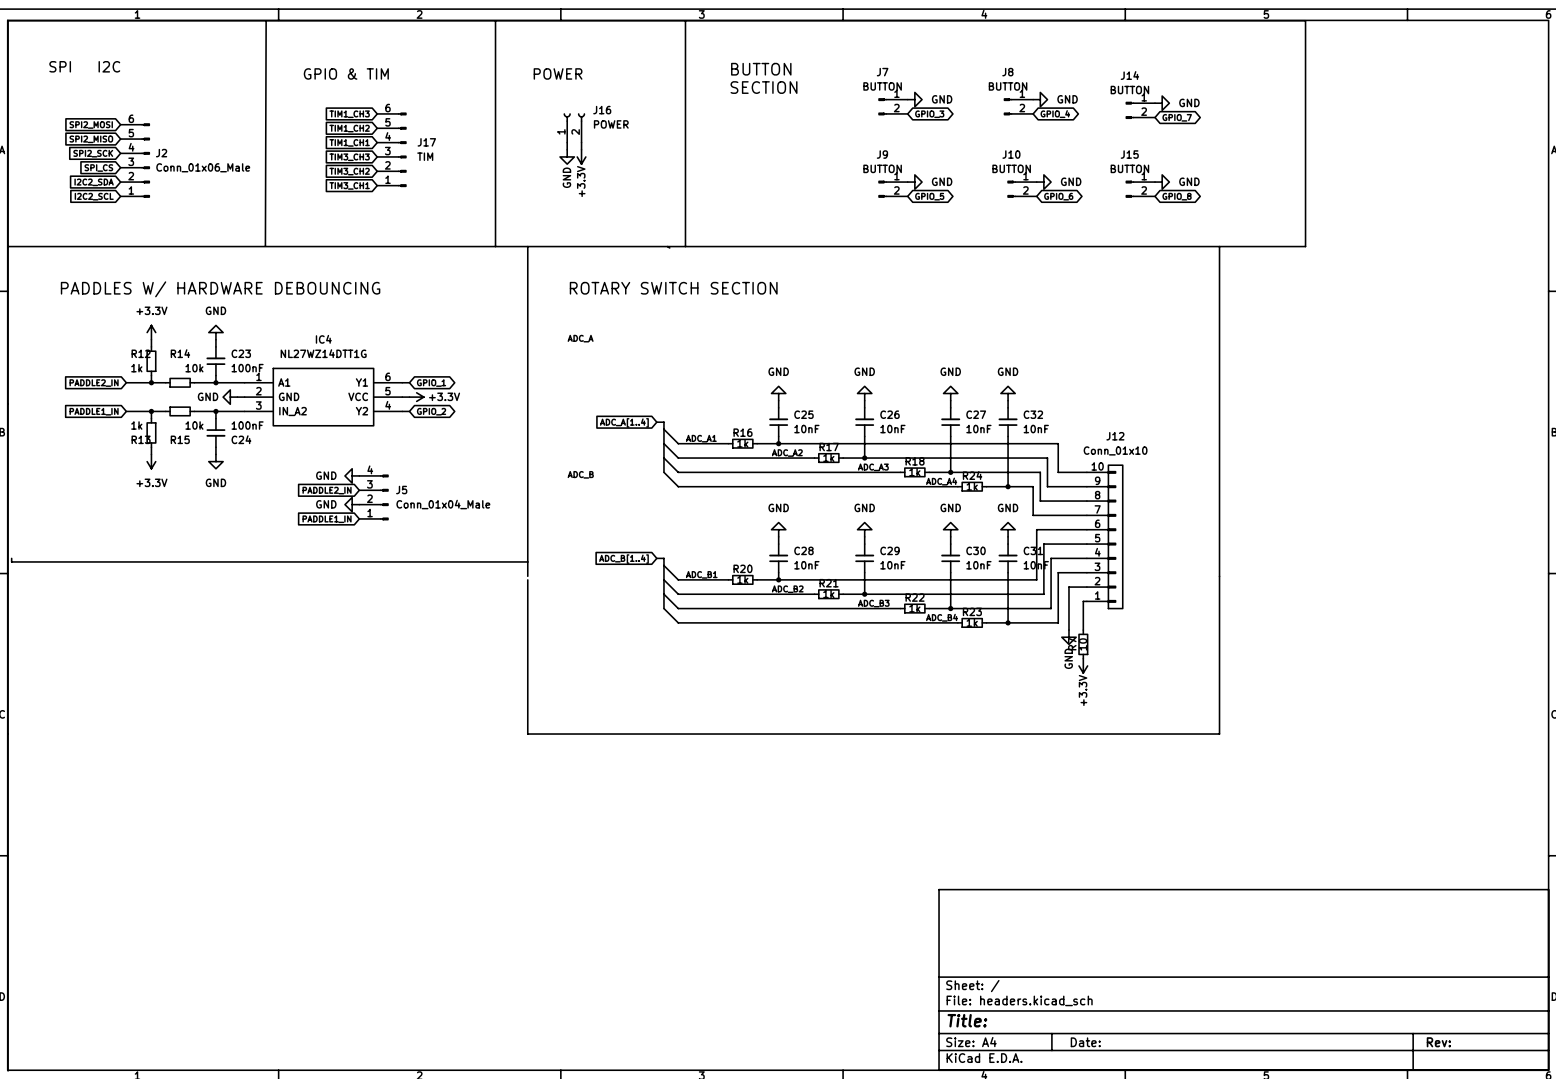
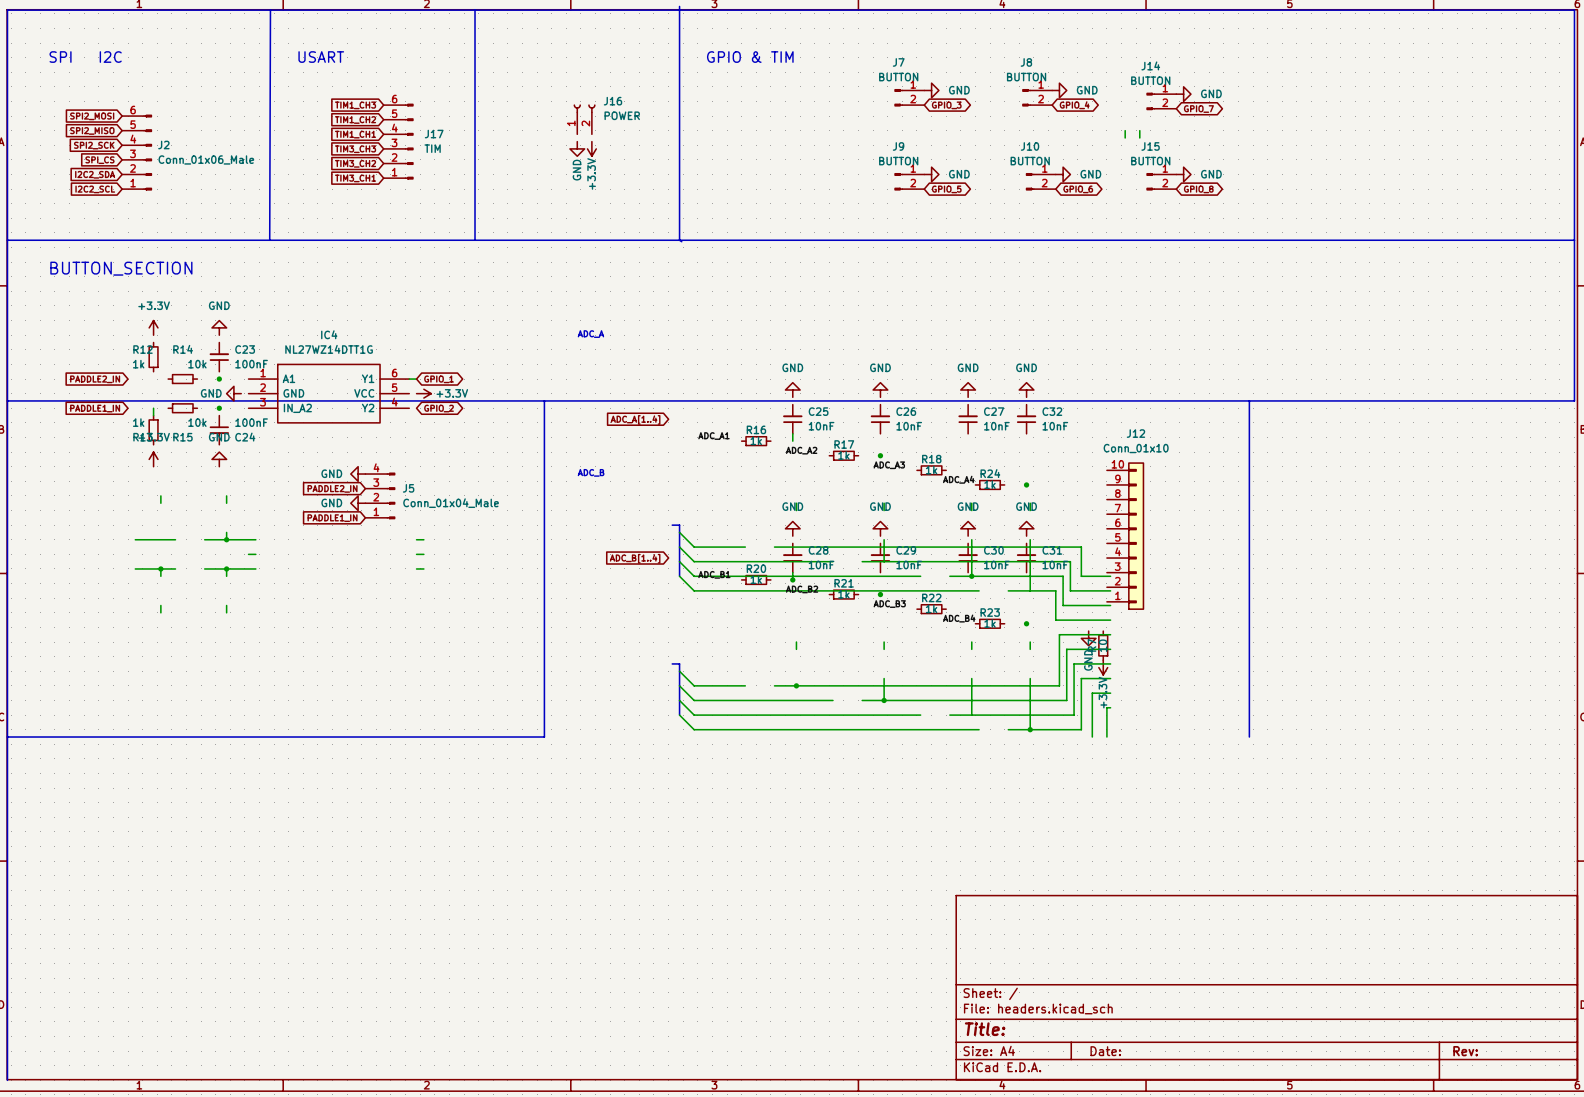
line: none -> (679, 6) (679, 240)
line: (495, 20) (495, 246) -> (475, 10) (475, 240)
line: (685, 20) (685, 246) -> none
line: (1305, 20) (1305, 246) -> (1574, 240) (1329, 240)
line: none -> (1329, 10) (1574, 10) (1574, 400) (7, 400)
text: none -> USART (321, 57)
text: none -> GPIO & TIM (750, 57)
text: BUTTON (761, 69) -> none
text: GPIO & TIM (346, 73) -> none
text: POWER (558, 73) -> none
text: SECTION (764, 87) -> none
wire: none -> (1125, 130) (1125, 137)
wire: none -> (1139, 130) (1139, 137)
wire: (567, 142) (567, 149) -> none
wire: (581, 142) (581, 149) -> none
line: (527, 246) (527, 576) -> none
line: (1219, 246) (1219, 734) (534, 734) -> (544, 400) (544, 737)
text: none -> BUTTON_SECTION (121, 268)
text: ROTARY SWITCH SECTION (673, 288) -> none
text: PADDLES W/ HARDWARE DEBOUNCING (220, 289) -> none
wire: (151, 339) (151, 346) -> none
wire: (215, 339) (215, 346) -> none
wire: (151, 375) (151, 382) -> (160, 495) (160, 503)
wire: (215, 375) (215, 382) -> (226, 495) (226, 503)
wire: (126, 382) (165, 382) -> none
junction: (151, 382) -> none
wire: (194, 382) (244, 382) -> none
wire: (237, 397) (244, 397) -> none
wire: (402, 397) (409, 397) -> none
wire: (778, 400) (778, 407) -> (796, 503) (796, 510)
wire: (864, 400) (864, 407) -> (884, 503) (884, 510)
wire: (950, 400) (950, 407) -> (971, 503) (971, 510)
wire: (1008, 400) (1008, 407) -> (1030, 503) (1030, 510)
line: none -> (1249, 400) (1249, 737)
wire: (126, 411) (165, 411) -> (135, 539) (175, 539)
junction: (151, 411) -> none
wire: (194, 411) (244, 411) -> (204, 539) (255, 539)
wire: (215, 411) (215, 418) -> (226, 532) (226, 539)
wire: (402, 411) (409, 411) -> (416, 539) (423, 539)
bus: (656, 422) (663, 422) (663, 472) -> (672, 525) (679, 525) (679, 576)
wire: (663, 429) (678, 443) (728, 443) -> (679, 532) (694, 547) (745, 547)
wire: (864, 436) (864, 458) -> (884, 539) (884, 561)
wire: (950, 436) (950, 472) -> (971, 539) (971, 576)
wire: (1008, 436) (1008, 486) -> (1030, 539) (1030, 590)
wire: (663, 443) (678, 458) -> none
wire: (757, 443) (1058, 443) (1058, 472) (1086, 472) -> (774, 547) (1081, 547) (1081, 576) (1110, 576)
junction: (778, 443) -> none
wire: (151, 447) (151, 454) -> (160, 568) (160, 576)
wire: (215, 447) (215, 454) -> (226, 568) (226, 576)
wire: (663, 458) (678, 472) (900, 472) -> (679, 561) (694, 576) (920, 576)
wire: (678, 458) (814, 458) -> none
wire: (843, 458) (1047, 458) (1047, 486) (1086, 486) -> none
power symbol rotation: 0° (151, 461) -> 180° (153, 459)
power symbol rotation: 0° (215, 461) -> 180° (219, 459)
wire: (663, 472) (678, 486) -> none
wire: (929, 472) (1040, 472) (1040, 501) (1086, 501) -> none
junction: (950, 472) -> none
wire: (678, 486) (957, 486) -> none
wire: (986, 486) (1033, 486) (1033, 515) (1086, 515) -> (1008, 590) (1055, 590) (1055, 620) (1110, 620)
wire: (1086, 529) (1036, 529) (1036, 579) (757, 579) -> (1110, 634) (1059, 634) (1059, 685) (774, 685)
wire: (778, 536) (778, 544) -> (796, 642) (796, 649)
wire: (864, 536) (864, 544) -> (884, 642) (884, 649)
wire: (950, 536) (950, 544) -> (971, 642) (971, 649)
wire: (1008, 536) (1008, 544) -> (1030, 642) (1030, 649)
junction: none -> (226, 539)
wire: (1086, 544) (1043, 544) (1043, 576) -> (949, 576) (1063, 576)
wire: none -> (679, 547) (694, 561) (832, 561)
wire: none -> (248, 554) (255, 554)
wire: none -> (416, 554) (423, 554)
line: (11, 558) (11, 561) (527, 561) -> none
bus: (656, 558) (663, 558) (663, 608) -> (672, 663) (679, 663) (679, 715)
wire: (1086, 558) (1051, 558) (1051, 561) -> (862, 561) (1070, 561)
wire: (663, 565) (678, 579) (728, 579) -> (679, 671) (694, 685) (745, 685)
wire: none -> (135, 568) (175, 568)
junction: none -> (160, 568)
wire: none -> (204, 568) (255, 568)
junction: none -> (226, 568)
wire: none -> (416, 568) (423, 568)
wire: (864, 572) (864, 594) -> (884, 678) (884, 700)
wire: (950, 572) (950, 608) -> (971, 678) (971, 715)
wire: (1008, 572) (1008, 622) -> (1030, 678) (1030, 729)
wire: (1086, 572) (1058, 572) (1058, 622) (986, 622) -> (1110, 678) (1081, 678) (1081, 729) (1008, 729)
wire: none -> (679, 576) (694, 590) (979, 590)
line: (527, 579) (527, 734) -> (7, 737) (537, 737)
wire: (663, 579) (678, 594) (814, 594) -> (679, 685) (694, 700) (832, 700)
wire: (1086, 587) (1068, 587) (1068, 630) -> (1110, 693) (1092, 693) (1092, 737)
wire: (1051, 590) (1051, 608) (929, 608) -> (1070, 590) (1110, 590)
wire: (663, 594) (678, 608) -> none
wire: (843, 594) (1043, 594) -> (1110, 605) (1063, 605) (1063, 594)
wire: (1086, 601) (1083, 601) (1083, 630) -> (1110, 707) (1106, 707) (1106, 737)
wire: none -> (160, 605) (160, 612)
wire: none -> (226, 605) (226, 612)
wire: (663, 608) (678, 622) (957, 622) -> (679, 715) (694, 729) (979, 729)
wire: (678, 608) (900, 608) -> none
junction position: (950, 608) -> (971, 576)
wire: none -> (1110, 649) (1066, 649) (1066, 700) (862, 700)
wire: none -> (1110, 663) (1074, 663) (1074, 715) (949, 715)
junction: none -> (796, 685)
wire: none -> (679, 700) (694, 715) (920, 715)
junction: none -> (884, 700)
junction: none -> (1030, 729)

